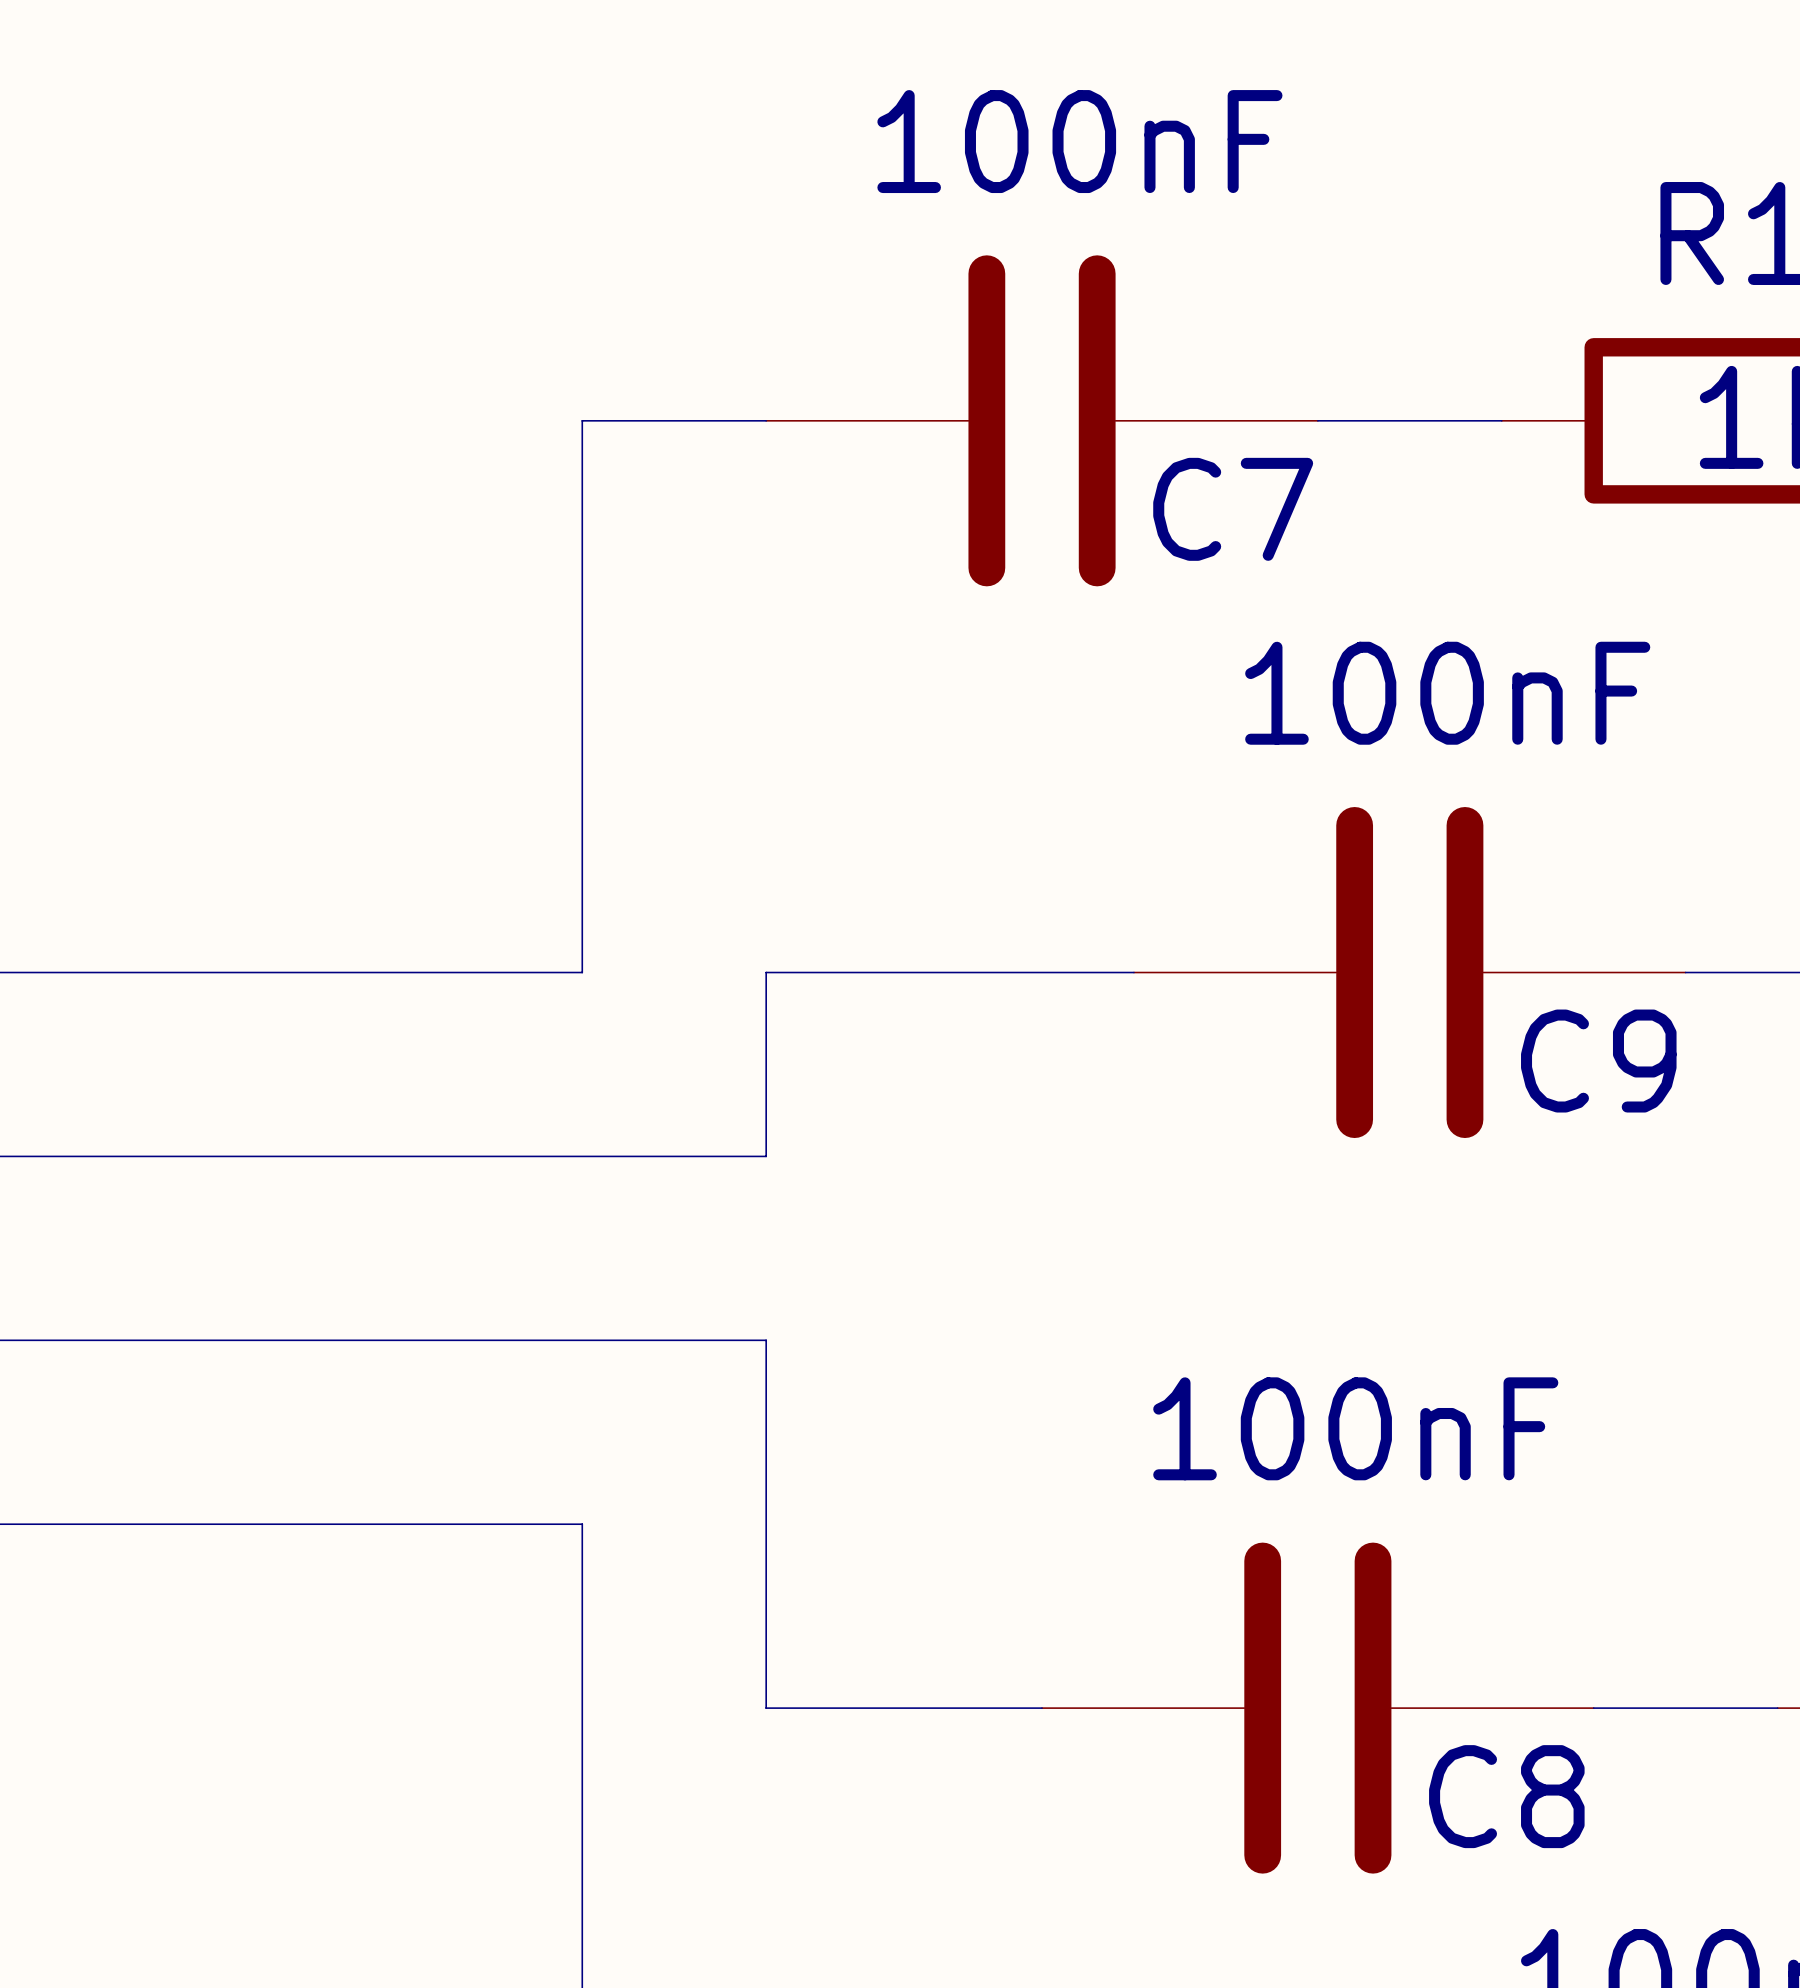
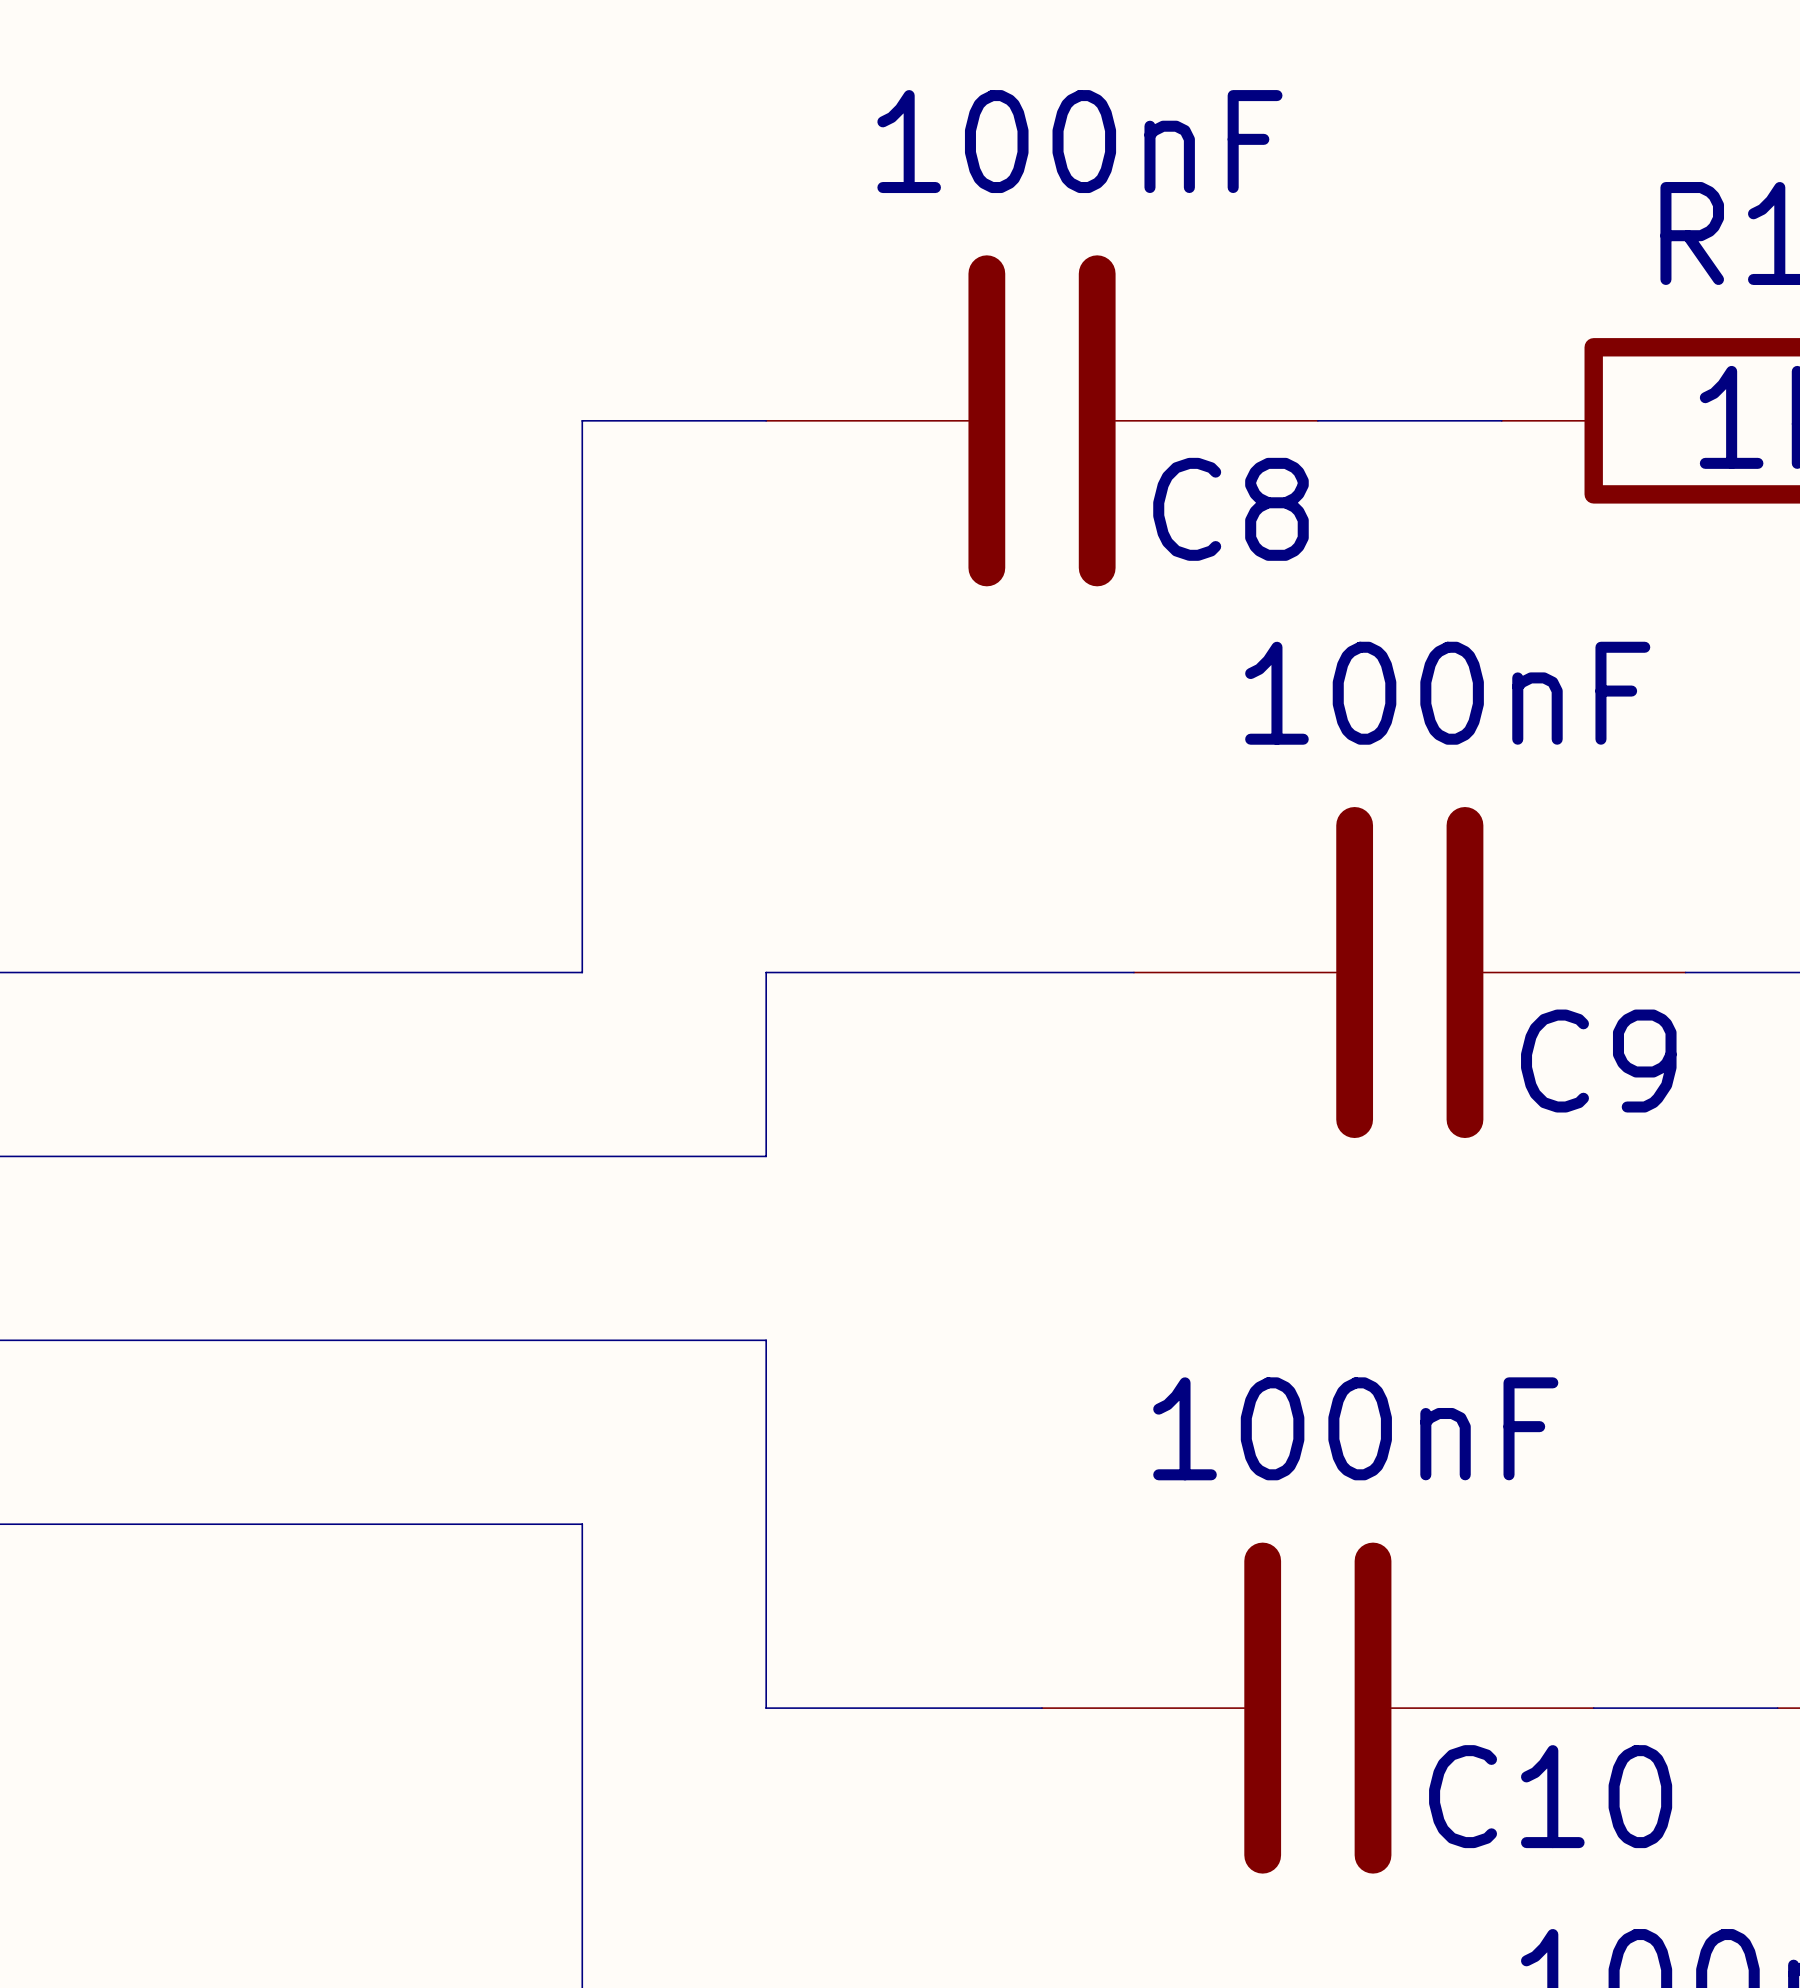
C7 name: C7 (1233, 509) -> C8 (1230, 509)
C8 name: C8 (1506, 1796) -> C10 (1550, 1796)

